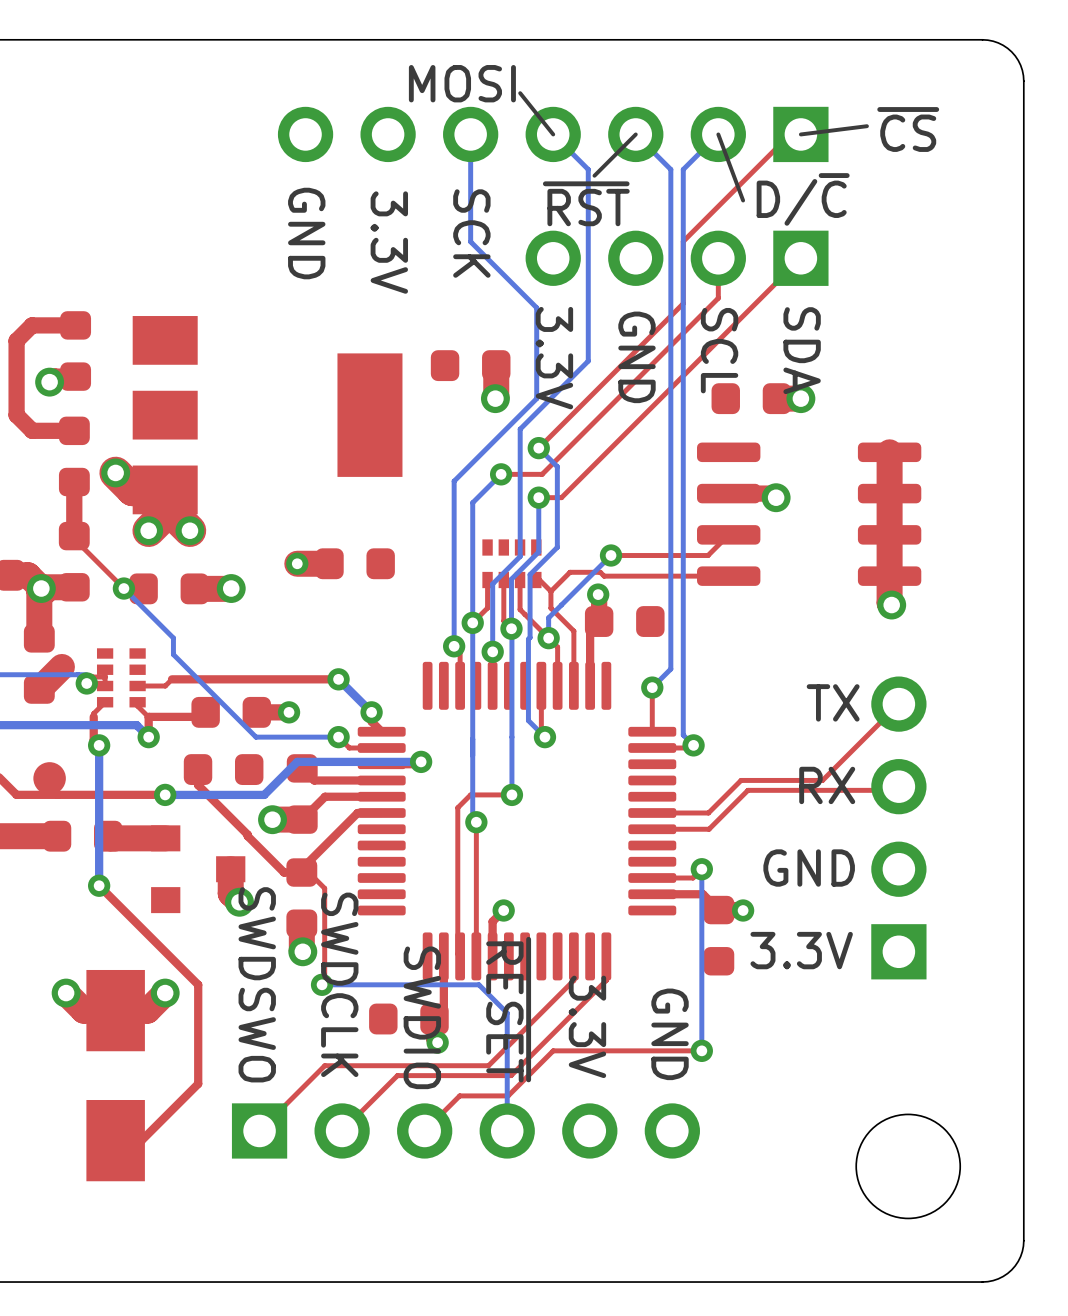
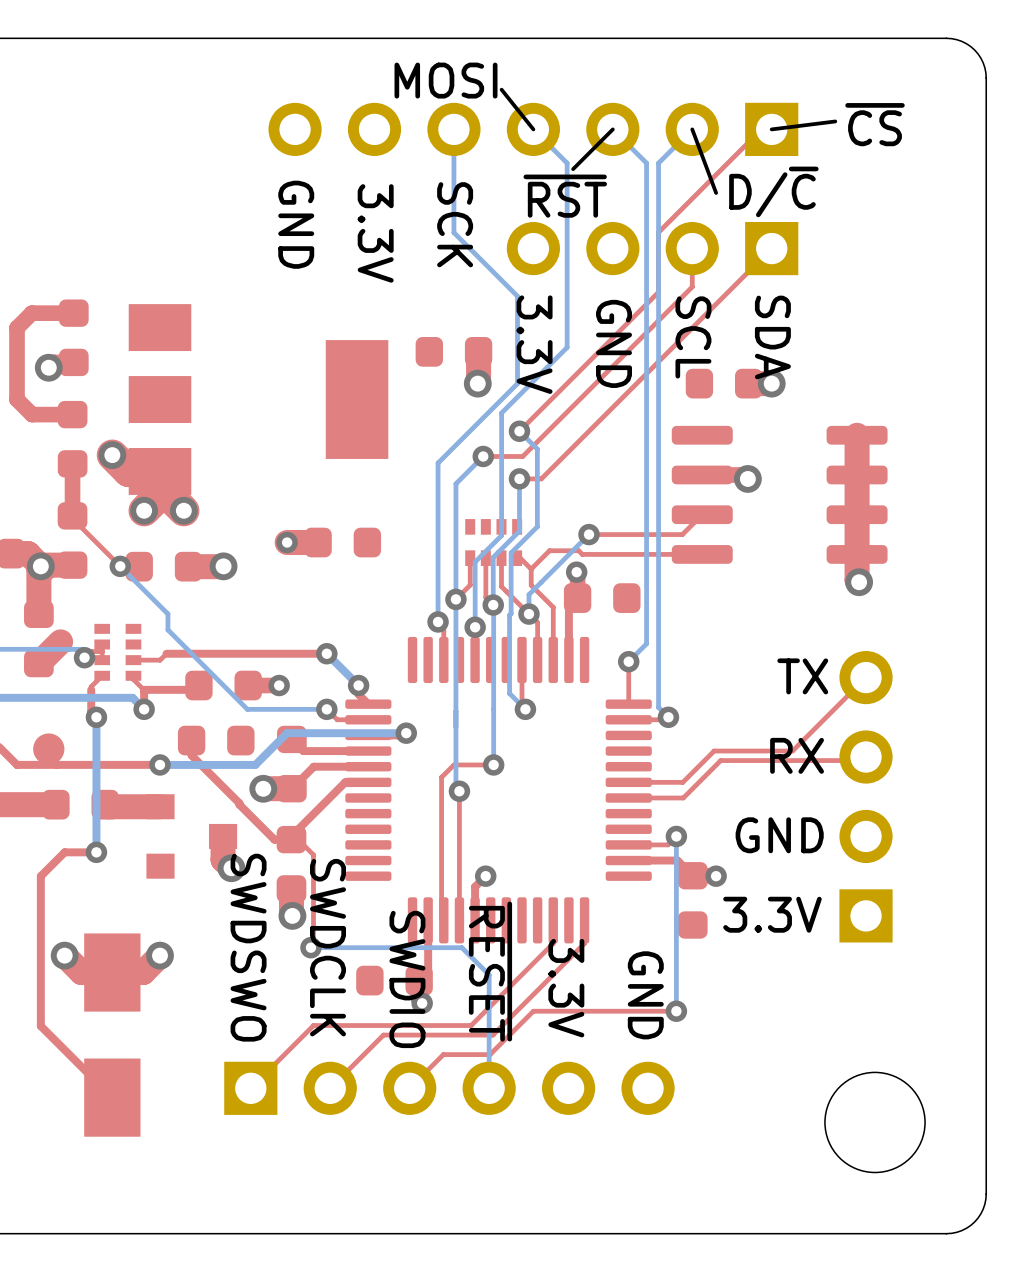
top track: (99, 885) (198, 984) (198, 1083) (141, 1140) (115, 1140) -> (96, 852) (64, 852) (40, 876) (40, 1026) (112, 1097)

